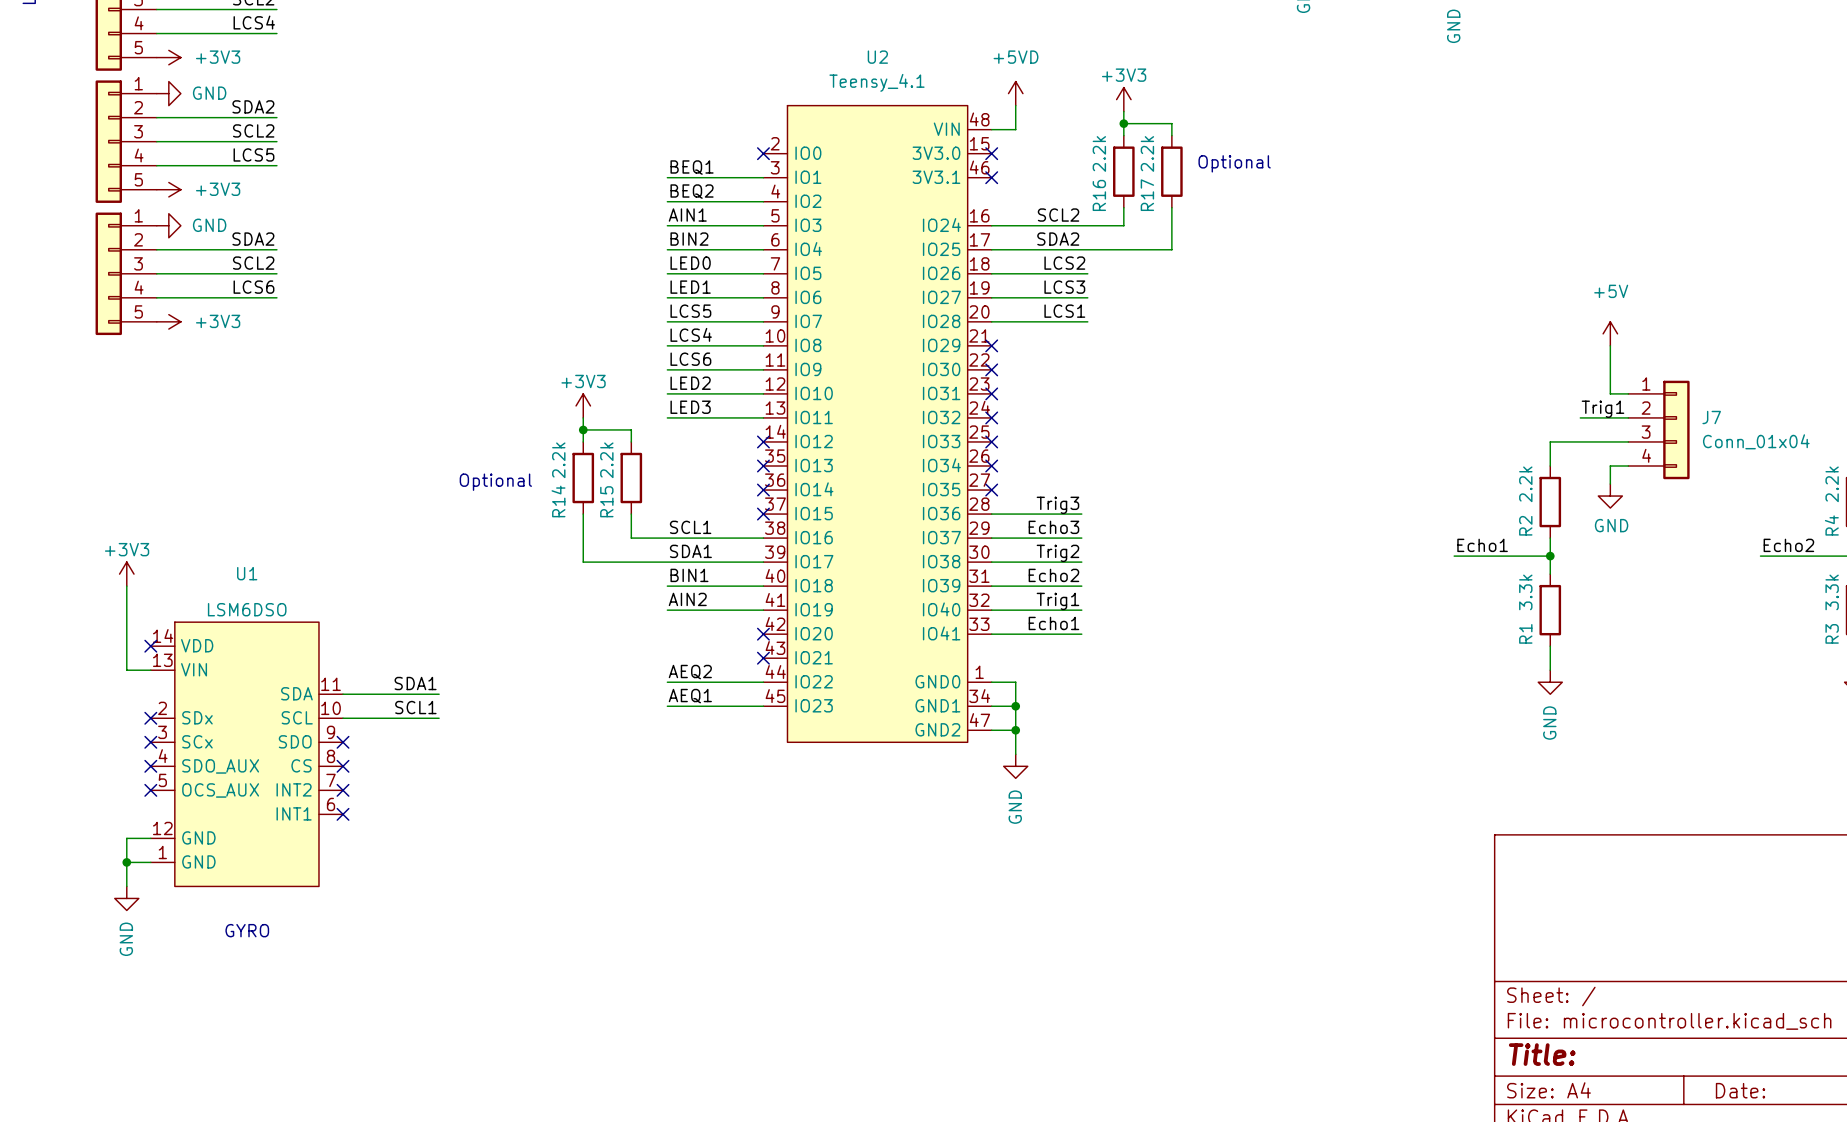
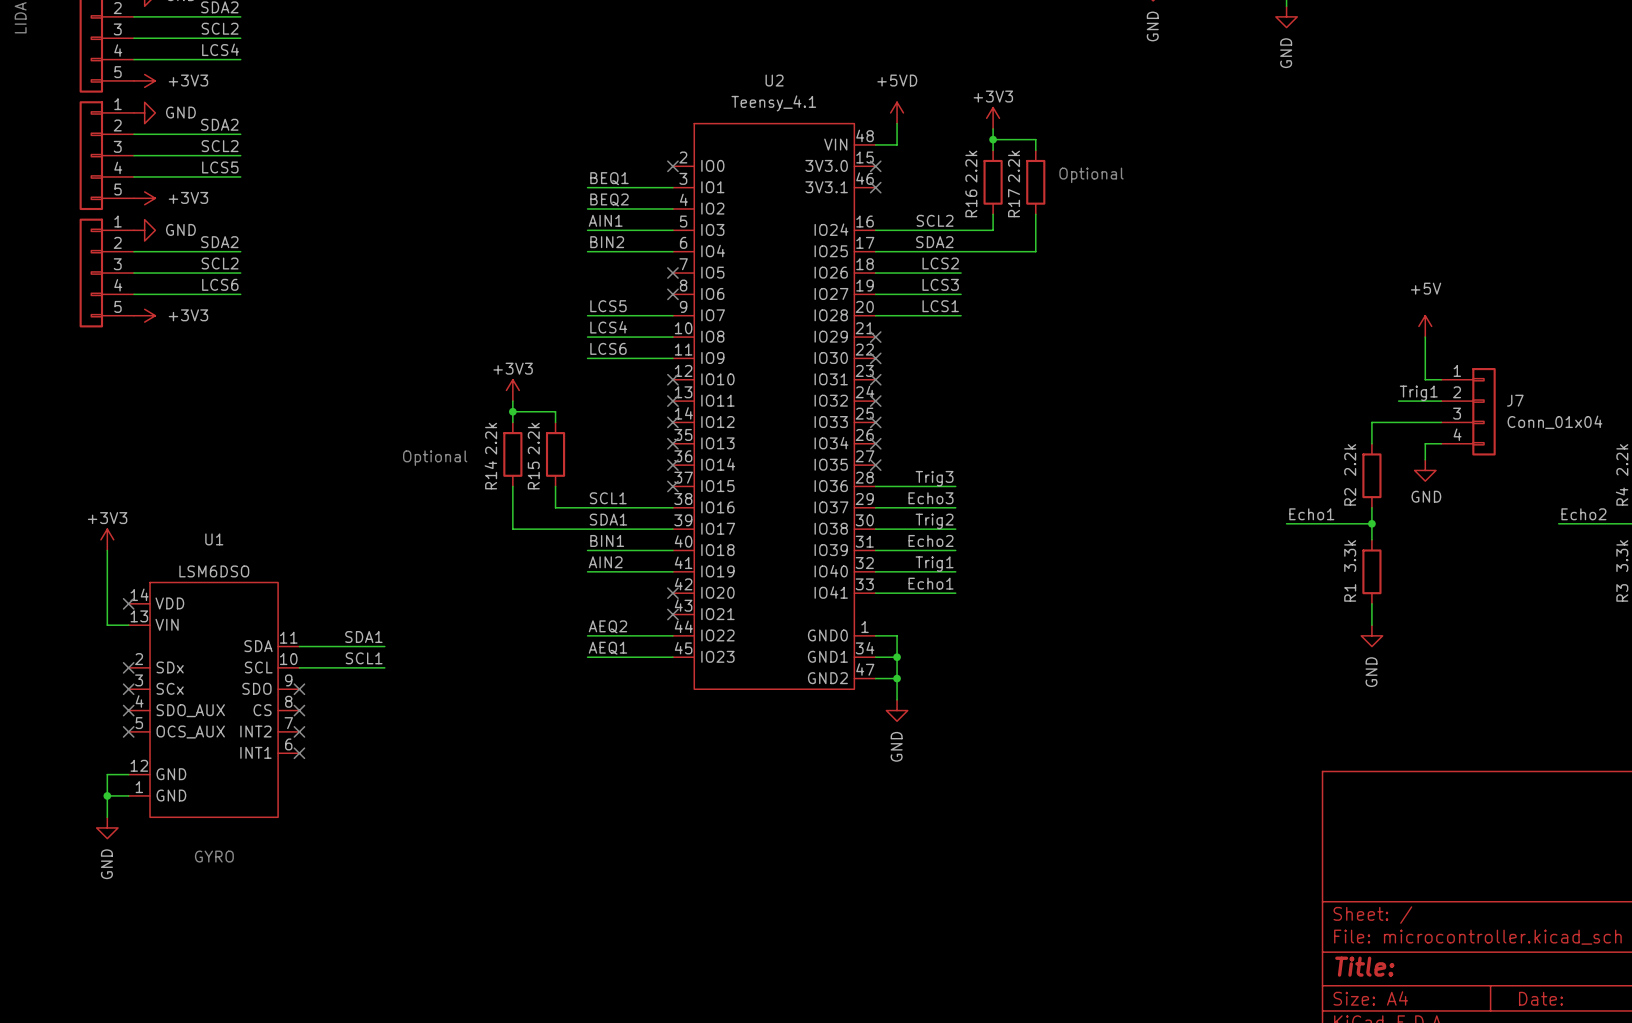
label: LED0 (690, 263) -> none
wire: (667, 273) (763, 273) -> none
no-connect mark: none -> (672, 273)
label: LED1 (690, 287) -> none
wire: (667, 297) (763, 297) -> none
no-connect mark: none -> (672, 294)
label: LED2 (690, 383) -> none
wire: (667, 393) (763, 393) -> none
no-connect mark: none -> (672, 379)
label: LED3 (690, 407) -> none
wire: (667, 417) (763, 417) -> none
no-connect mark: none -> (672, 401)

